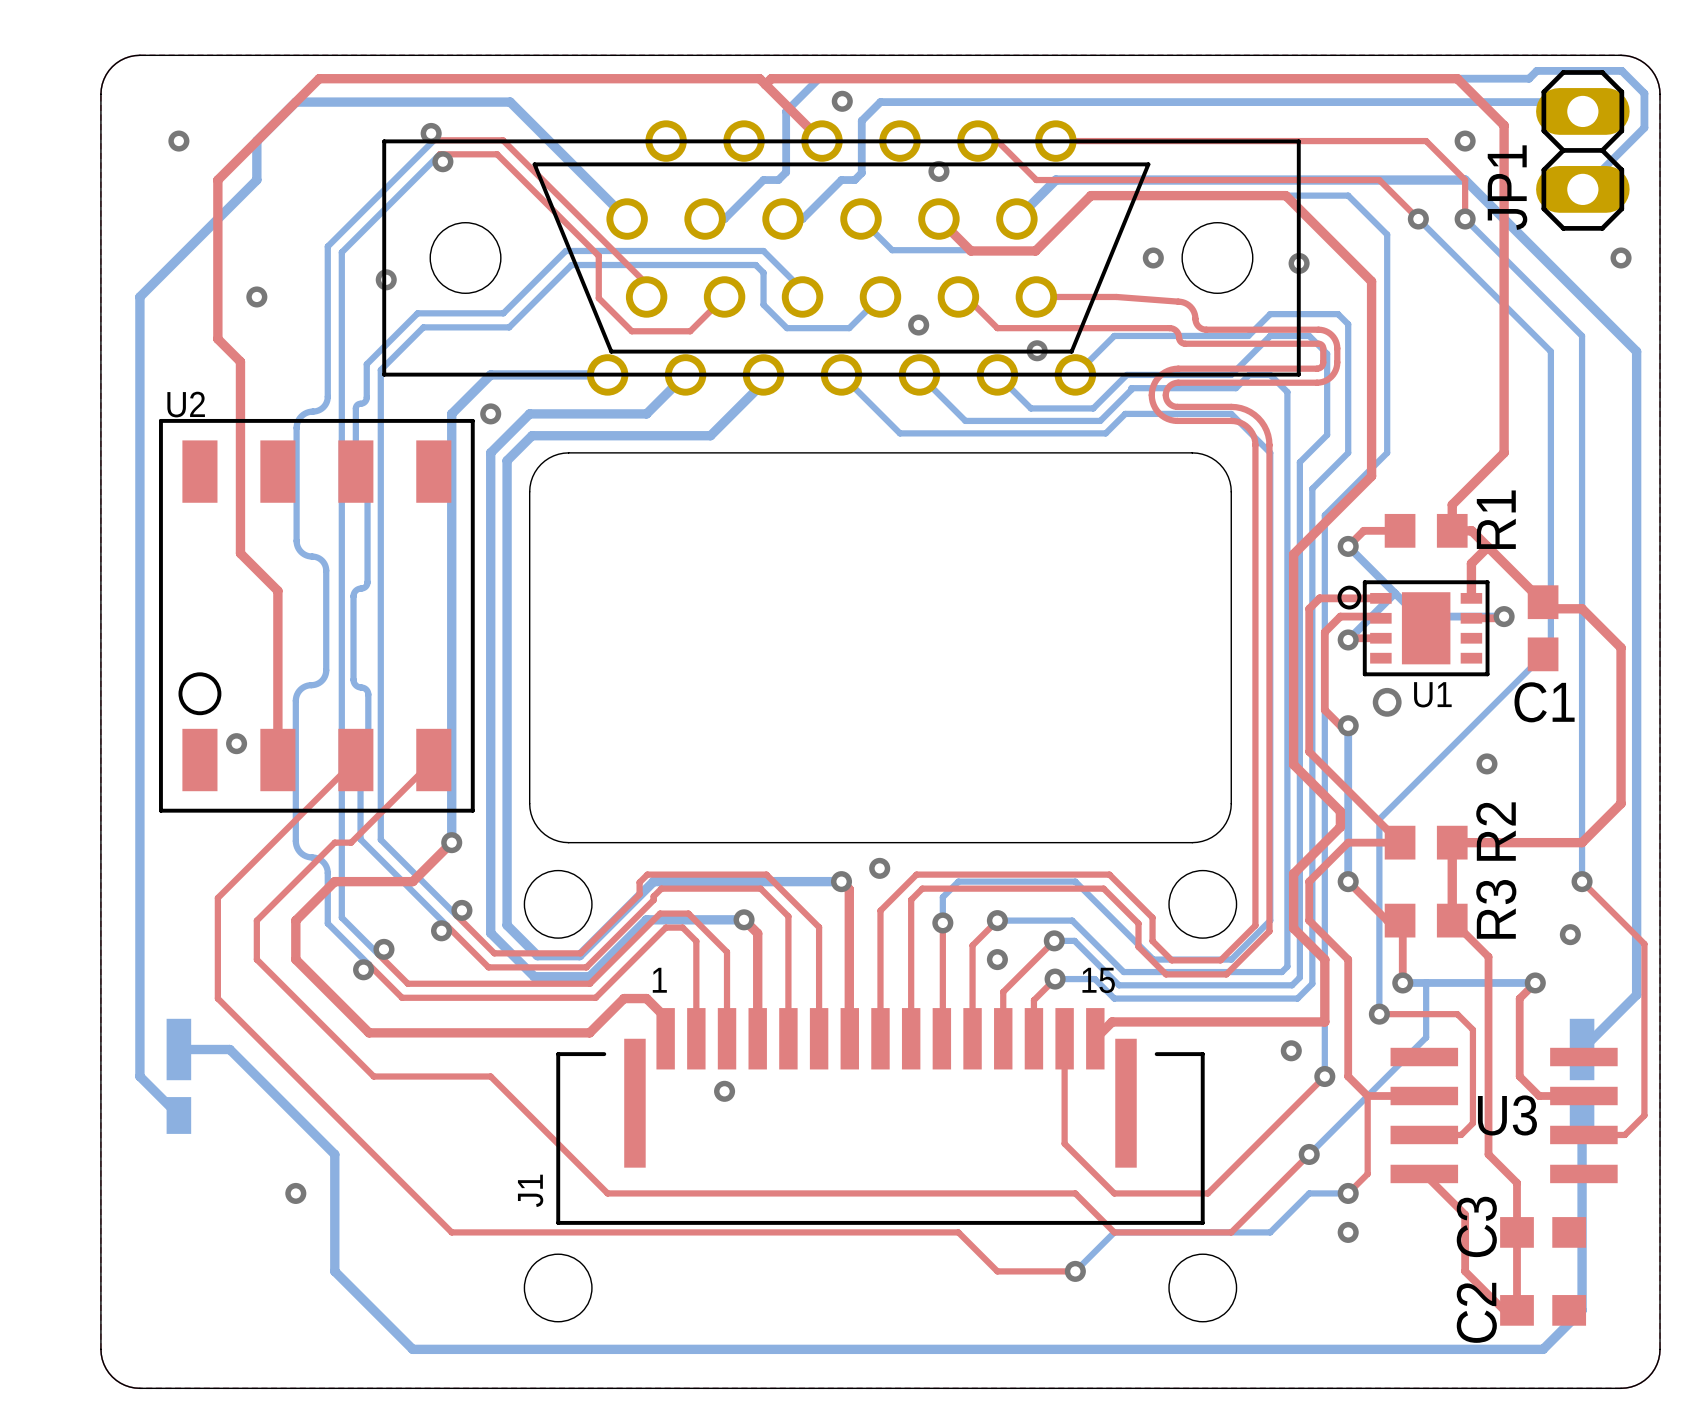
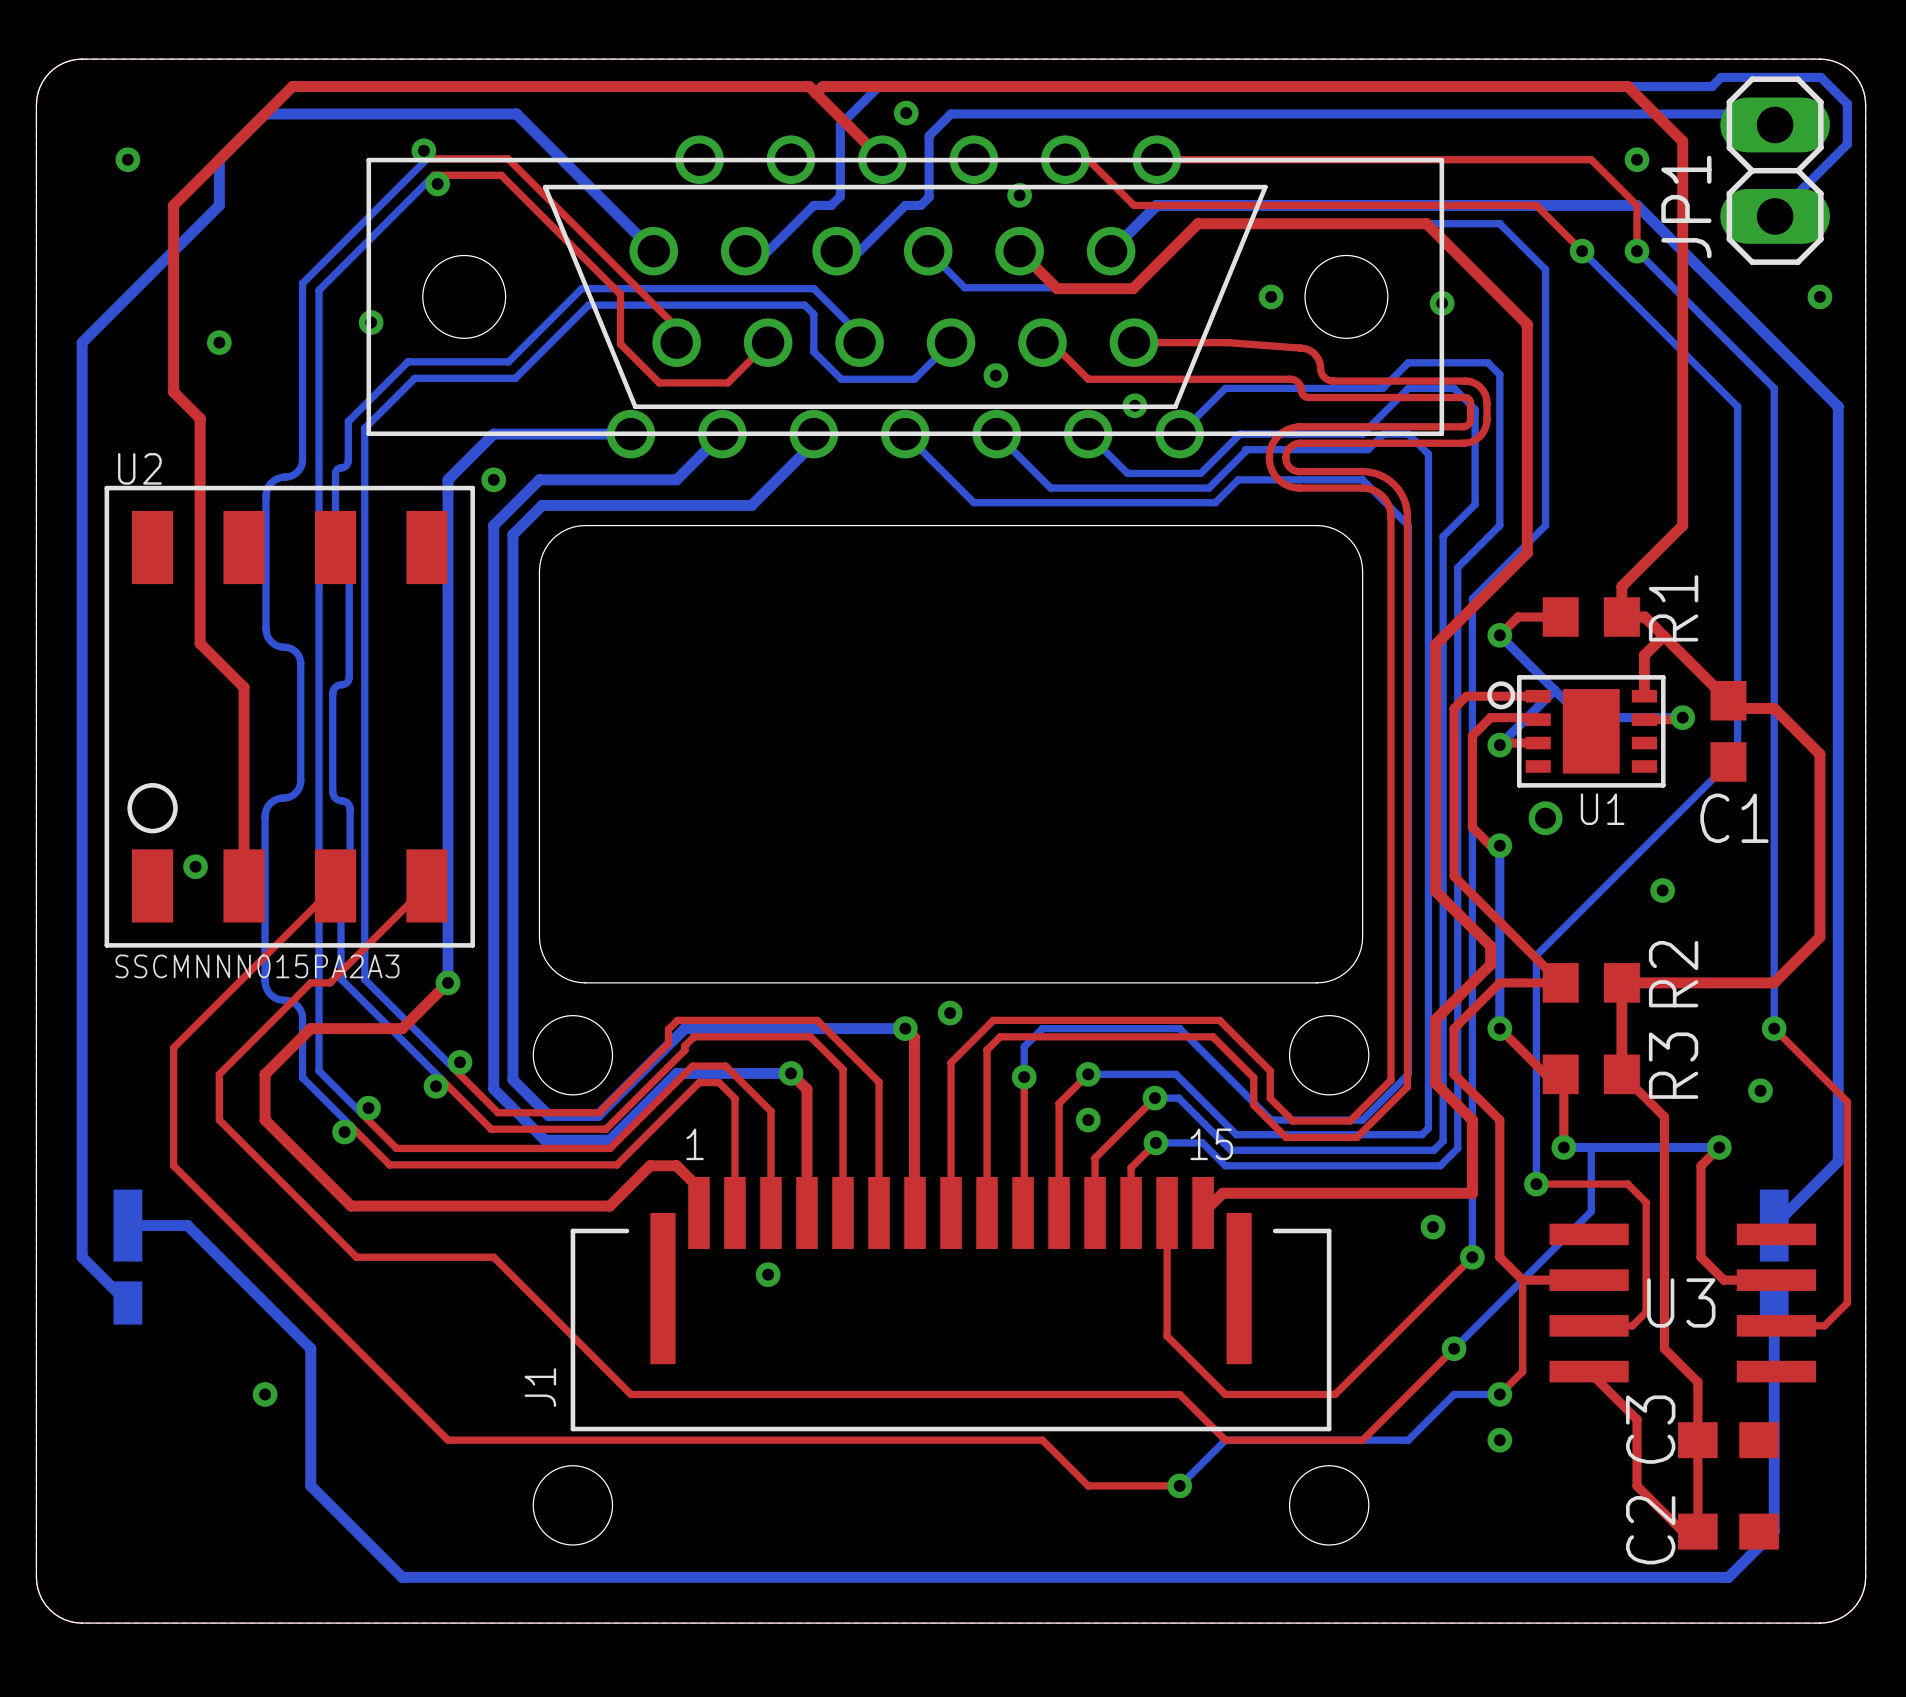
U2 value: none -> SSCMNNN015PA2A3 (257, 966)

